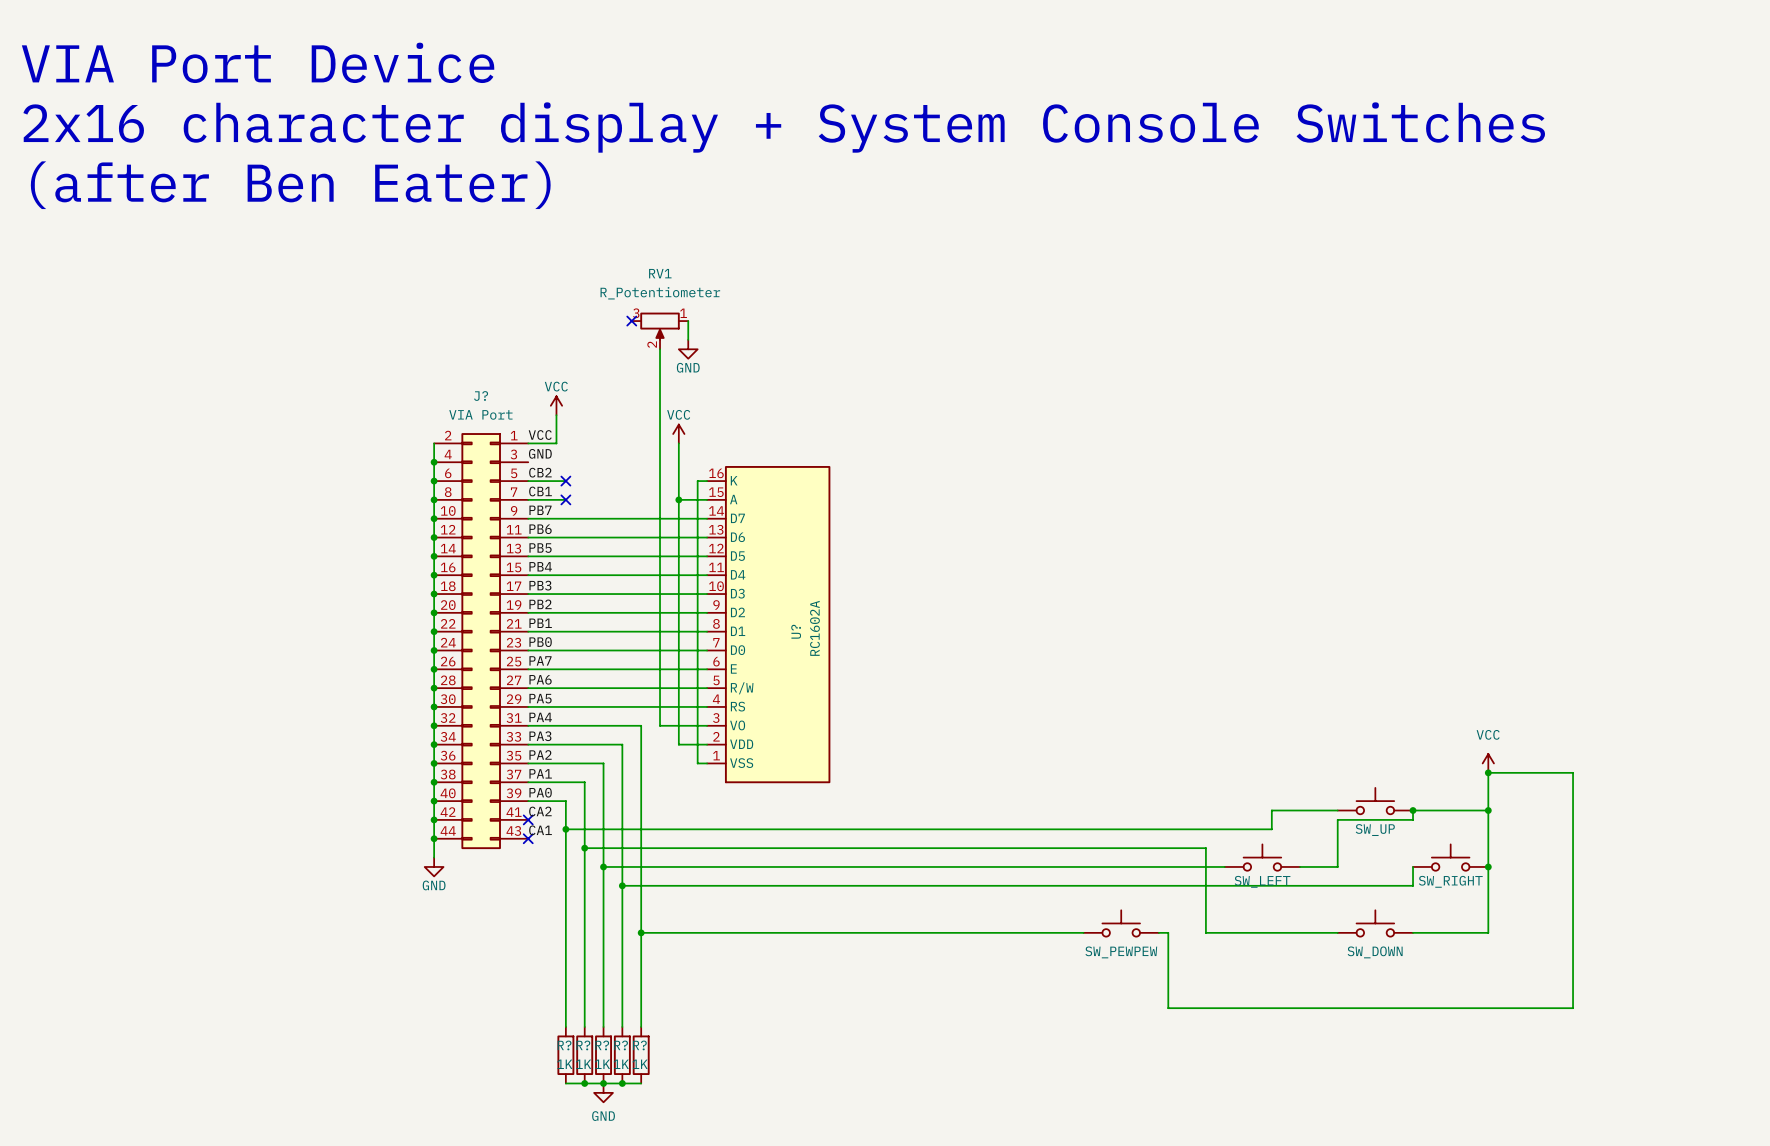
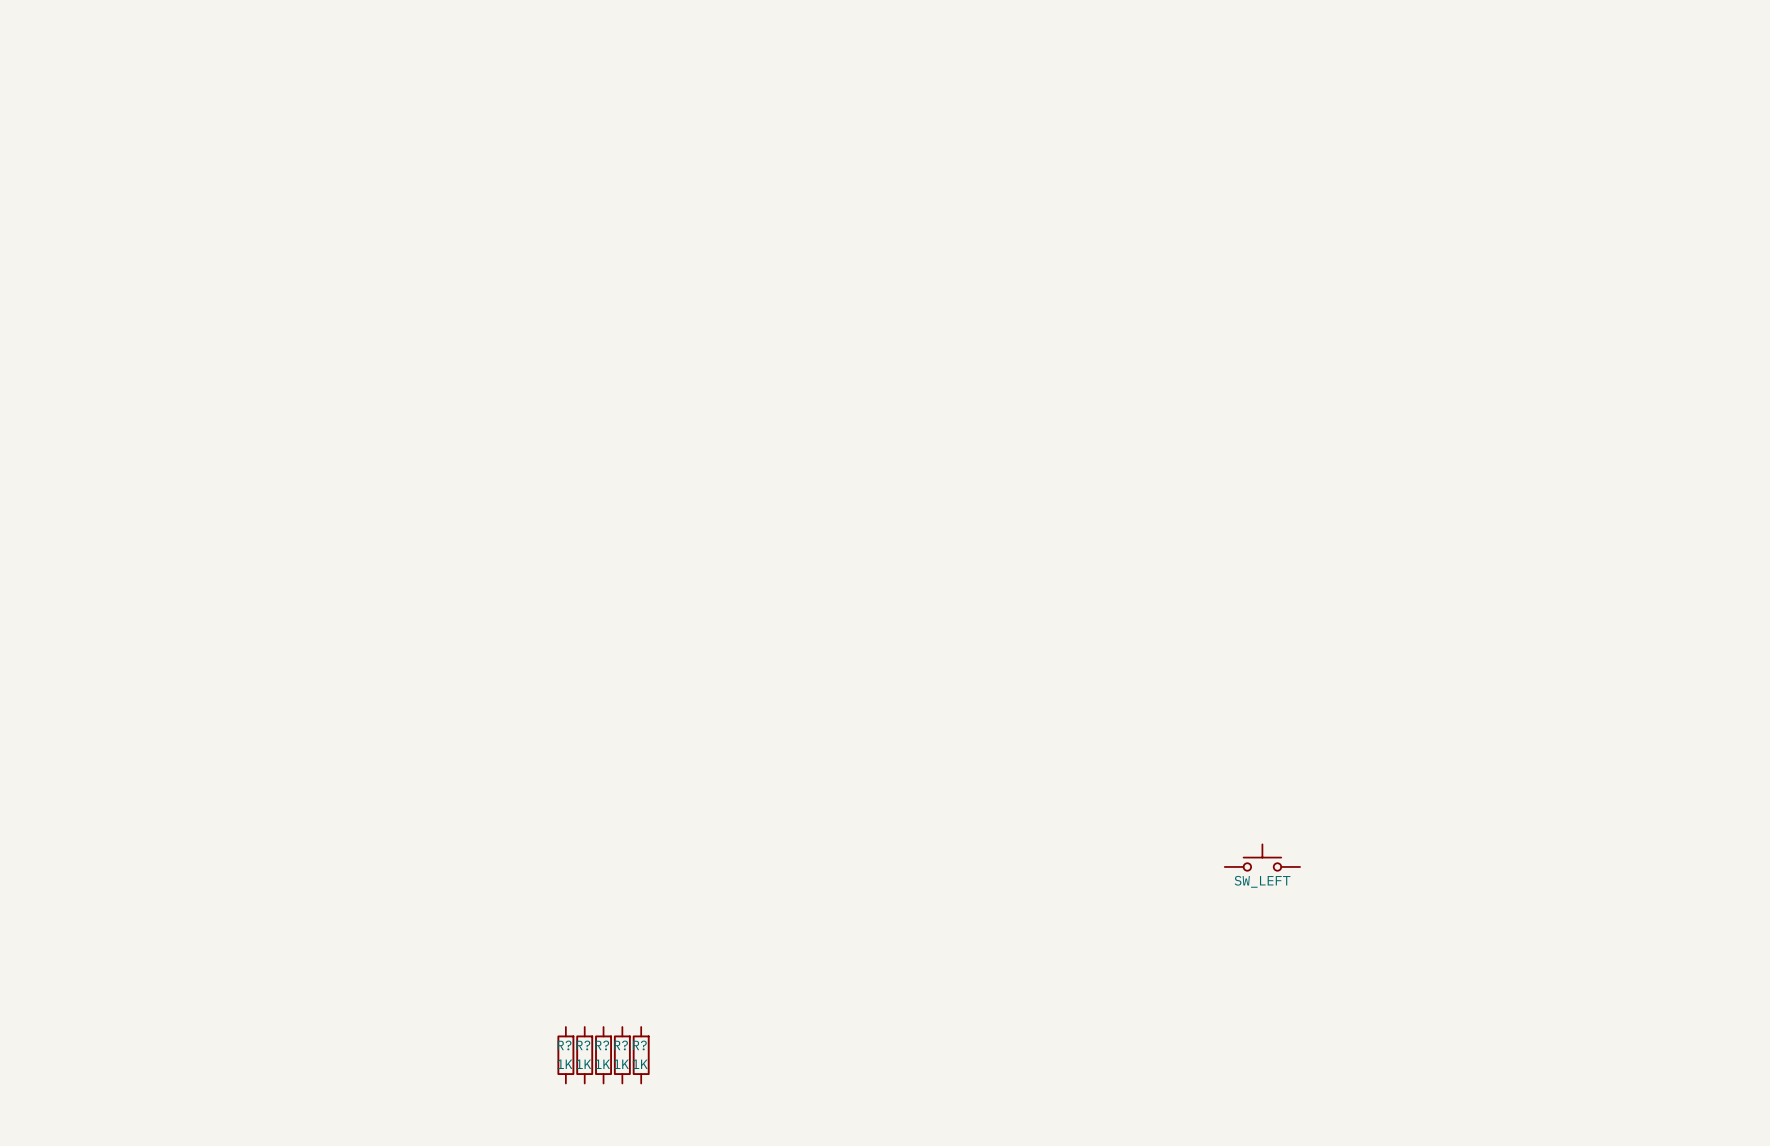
text: VIA Port Device (258, 62) -> none
text: 2x16 character display + System Console Switches (784, 127) -> none
text: (after Ben Eater) (290, 185) -> none
no-connect mark: (631, 321) -> none
wire: (688, 321) (688, 339) -> none
RV1: R_Potentiometer (660, 330) -> none
wire: (660, 349) (660, 725) (707, 725) -> none
power symbol: GND (688, 349) -> none
power symbol: VCC (556, 405) -> none
wire: (556, 415) (556, 443) (528, 443) -> none
power symbol: VCC (678, 434) -> none
label: VCC (540, 435) -> none
wire: (434, 443) (434, 857) -> none
wire: (678, 443) (678, 744) (707, 744) -> none
label: GND (540, 453) -> none
junction: (434, 462) -> none
label: CB2 (540, 472) -> none
junction: (434, 481) -> none
wire: (528, 481) (565, 481) -> none
no-connect mark: (565, 481) -> none
wire: (707, 481) (697, 481) (697, 763) (707, 763) -> none
label: CB1 (540, 491) -> none
junction: (434, 499) -> none
wire: (528, 499) (565, 499) -> none
no-connect mark: (565, 499) -> none
wire: (678, 499) (707, 499) -> none
junction: (678, 499) -> none
label: PB7 (540, 510) -> none
junction: (434, 518) -> none
wire: (528, 518) (707, 518) -> none
label: PB6 (540, 529) -> none
junction: (434, 537) -> none
wire: (528, 537) (707, 537) -> none
label: PB5 (540, 548) -> none
junction: (434, 556) -> none
wire: (528, 556) (707, 556) -> none
label: PB4 (540, 566) -> none
junction: (434, 575) -> none
wire: (528, 575) (707, 575) -> none
label: PB3 (540, 585) -> none
junction: (434, 594) -> none
wire: (528, 594) (707, 594) -> none
label: PB2 (540, 604) -> none
junction: (434, 612) -> none
wire: (528, 612) (707, 612) -> none
label: PB1 (540, 623) -> none
U?: RC1602A (768, 624) -> none
junction: (434, 631) -> none
wire: (528, 631) (707, 631) -> none
J?: VIA Port (481, 641) -> none
label: PB0 (540, 642) -> none
junction: (434, 650) -> none
wire: (528, 650) (707, 650) -> none
label: PA7 (540, 660) -> none
junction: (434, 669) -> none
wire: (528, 669) (707, 669) -> none
label: PA6 (540, 679) -> none
junction: (434, 688) -> none
wire: (528, 688) (707, 688) -> none
label: PA5 (540, 698) -> none
junction: (434, 706) -> none
wire: (528, 706) (707, 706) -> none
label: PA4 (540, 717) -> none
junction: (434, 725) -> none
wire: (528, 725) (641, 725) (641, 1027) -> none
label: PA3 (540, 736) -> none
junction: (434, 744) -> none
wire: (528, 744) (622, 744) (622, 1027) -> none
label: PA2 (540, 754) -> none
junction: (434, 763) -> none
wire: (528, 763) (603, 763) (603, 1027) -> none
power symbol: VCC (1488, 763) -> none
junction: (1488, 772) -> none
label: PA1 (540, 773) -> none
junction: (434, 782) -> none
wire: (528, 782) (584, 782) (584, 1027) -> none
label: PA0 (540, 792) -> none
junction: (434, 801) -> none
wire: (528, 801) (565, 801) (565, 1027) -> none
SW_UP: (1375, 801) -> none
wire: (1337, 810) (1271, 810) (1271, 829) (565, 829) -> none
junction: (1413, 810) -> none
wire: (1488, 810) (1413, 810) (1413, 819) (1337, 819) (1337, 866) (1300, 866) -> none
junction: (1488, 810) -> none
label: CA2 (540, 811) -> none
junction: (434, 819) -> none
no-connect mark: (528, 819) -> none
junction: (565, 829) -> none
label: CA1 (540, 830) -> none
junction: (434, 838) -> none
no-connect mark: (528, 838) -> none
wire: (584, 848) (1205, 848) (1205, 932) (1337, 932) -> none
junction: (584, 848) -> none
SW_RIGHT: (1450, 857) -> none
power symbol: GND (434, 866) -> none
wire: (603, 866) (1224, 866) -> none
junction: (603, 866) -> none
wire: (1413, 866) (1413, 885) (622, 885) -> none
junction: (1488, 866) -> none
junction: (622, 885) -> none
SW_PEWPEW: (1121, 923) -> none
SW_DOWN: (1375, 923) -> none
wire: (641, 932) (1083, 932) -> none
junction: (641, 932) -> none
wire: (1158, 932) (1168, 932) (1168, 1008) (1573, 1008) (1573, 772) (1488, 772) (1488, 932) (1413, 932) -> none
wire: (565, 1083) (641, 1083) -> none
junction: (584, 1083) -> none
junction: (603, 1083) -> none
junction: (622, 1083) -> none
power symbol: GND (603, 1092) -> none

